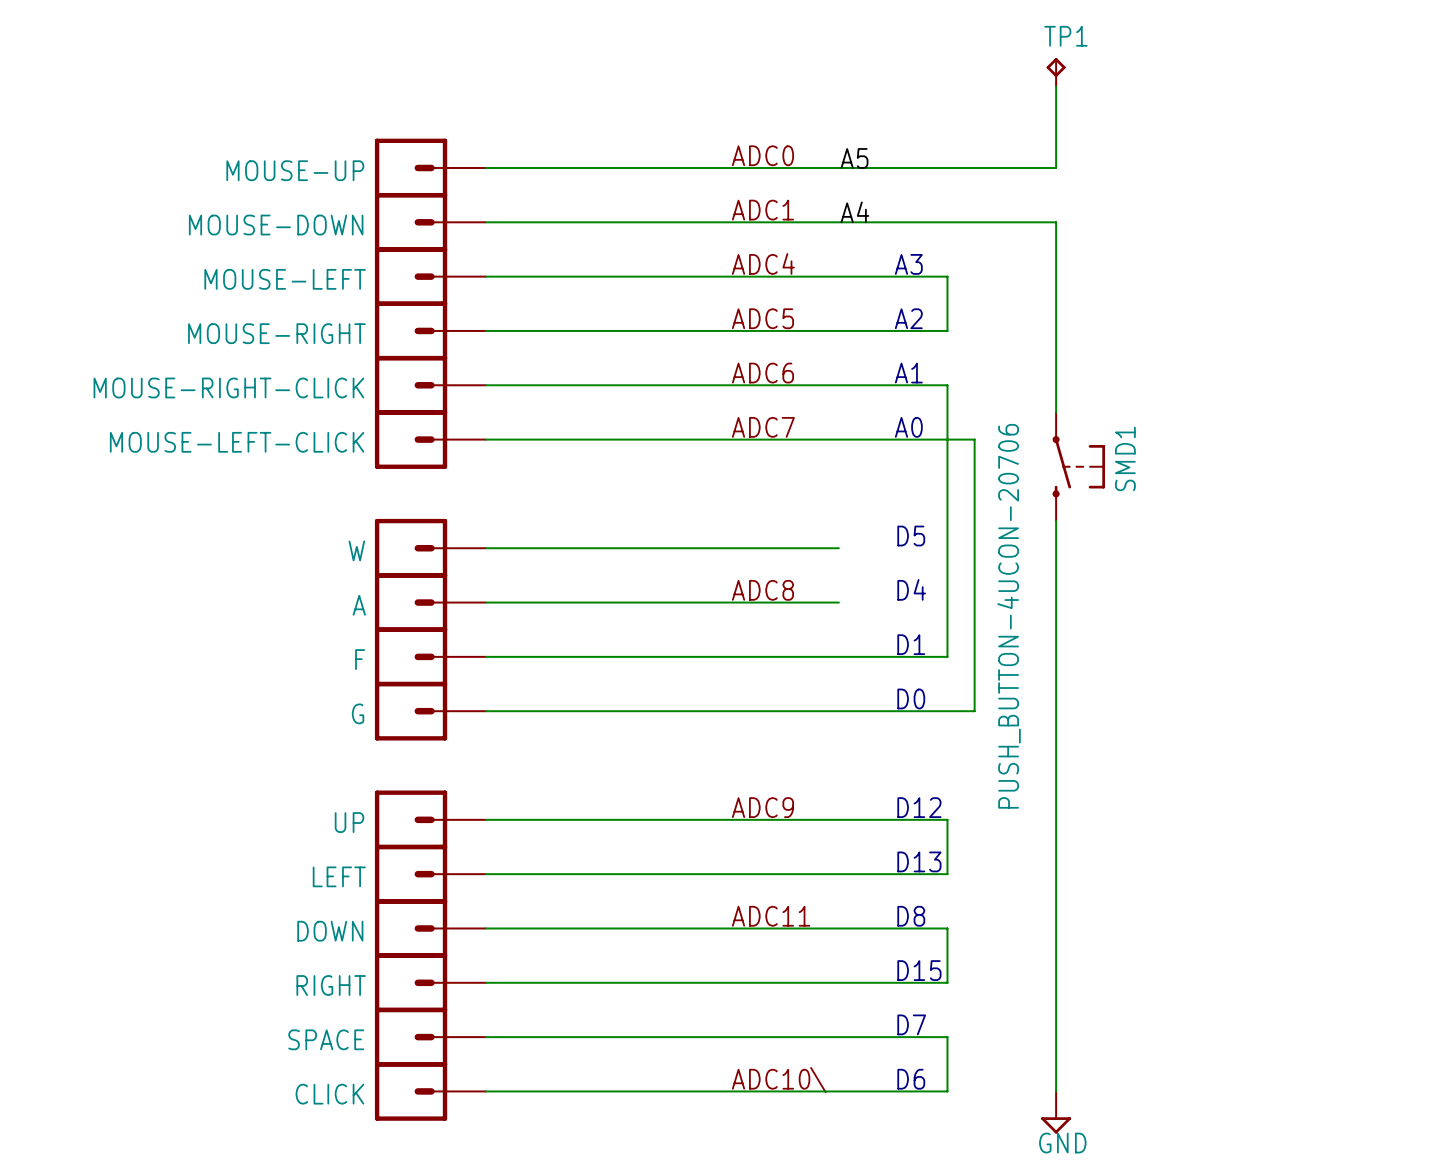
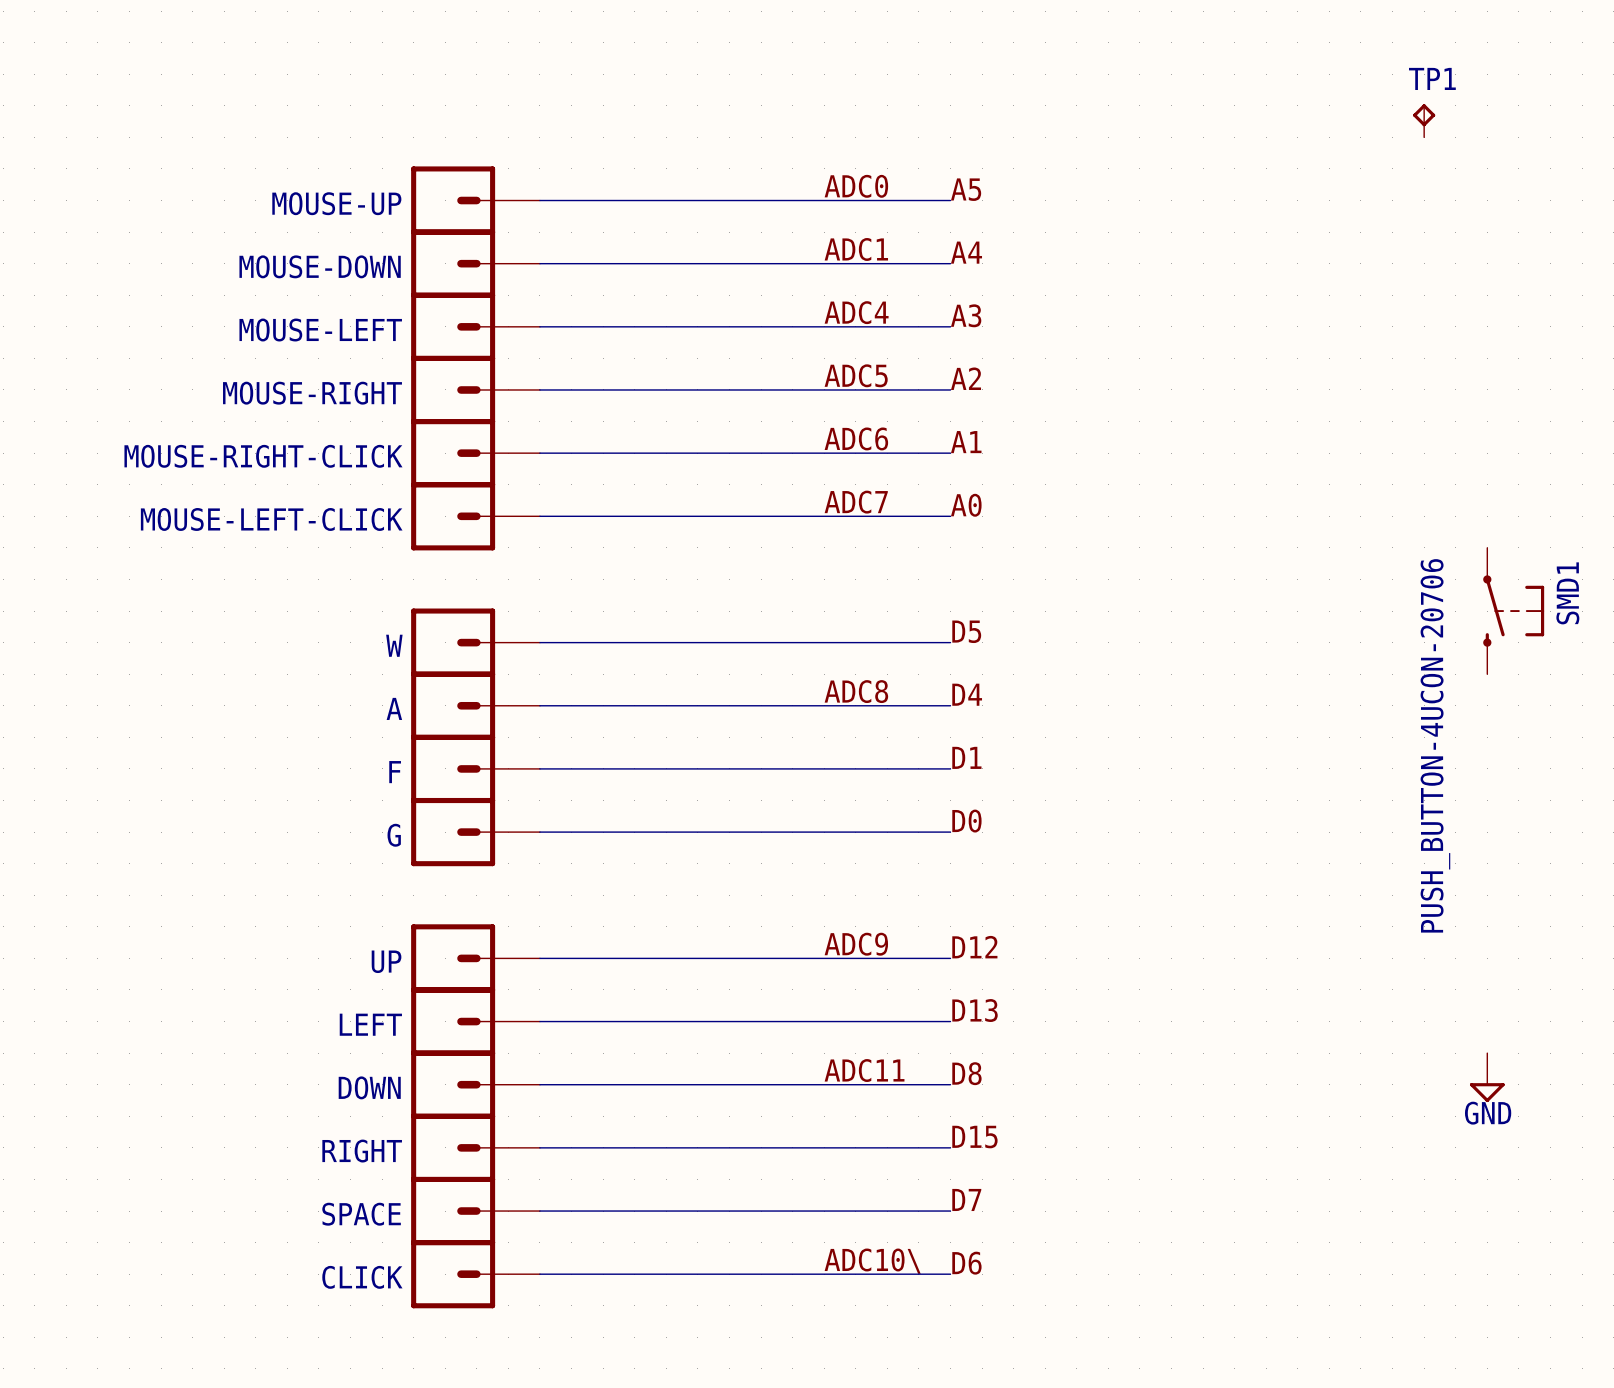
TP1 position: (1056, 72) -> (1424, 120)
wire: (1056, 86) (1056, 167) (838, 167) -> none
wire: (838, 222) (1056, 222) (1056, 412) -> none
text: A3 (908, 264) -> none
label: none -> A3 (966, 315)
wire: (838, 276) (947, 276) (947, 330) (838, 330) -> none
text: A2 (908, 318) -> none
label: none -> A2 (965, 378)
text: A1 (908, 373) -> none
label: none -> A1 (966, 442)
wire: (838, 385) (947, 385) (947, 656) (838, 656) -> none
text: A0 (908, 427) -> none
label: none -> A0 (966, 505)
wire: (838, 439) (974, 439) (974, 711) (838, 711) -> none
SMD1 position: (1078, 466) -> (1513, 611)
wire: (1056, 521) (1056, 1091) -> none
text: D5 (911, 536) -> none
label: none -> D5 (966, 631)
text: D4 (911, 589) -> none
label: none -> D4 (967, 694)
text: D1 (911, 644) -> none
label: none -> D1 (966, 757)
text: D0 (911, 698) -> none
label: none -> D0 (966, 821)
text: D12 (919, 807) -> none
label: none -> D12 (974, 947)
wire: (838, 819) (947, 819) (947, 874) (838, 874) -> none
text: D13 (919, 861) -> none
label: none -> D13 (975, 1010)
text: D8 (911, 916) -> none
label: none -> D8 (966, 1073)
power symbol: none -> GND (1487, 1077)
wire: (838, 928) (947, 928) (947, 982) (838, 982) -> none
text: D15 (919, 970) -> none
label: none -> D15 (974, 1137)
text: D7 (911, 1024) -> none
label: none -> D7 (966, 1199)
wire: (838, 1037) (947, 1037) (947, 1091) (838, 1091) -> none
text: D6 (911, 1079) -> none
label: none -> D6 (966, 1263)
power symbol: GND (1056, 1112) -> none

